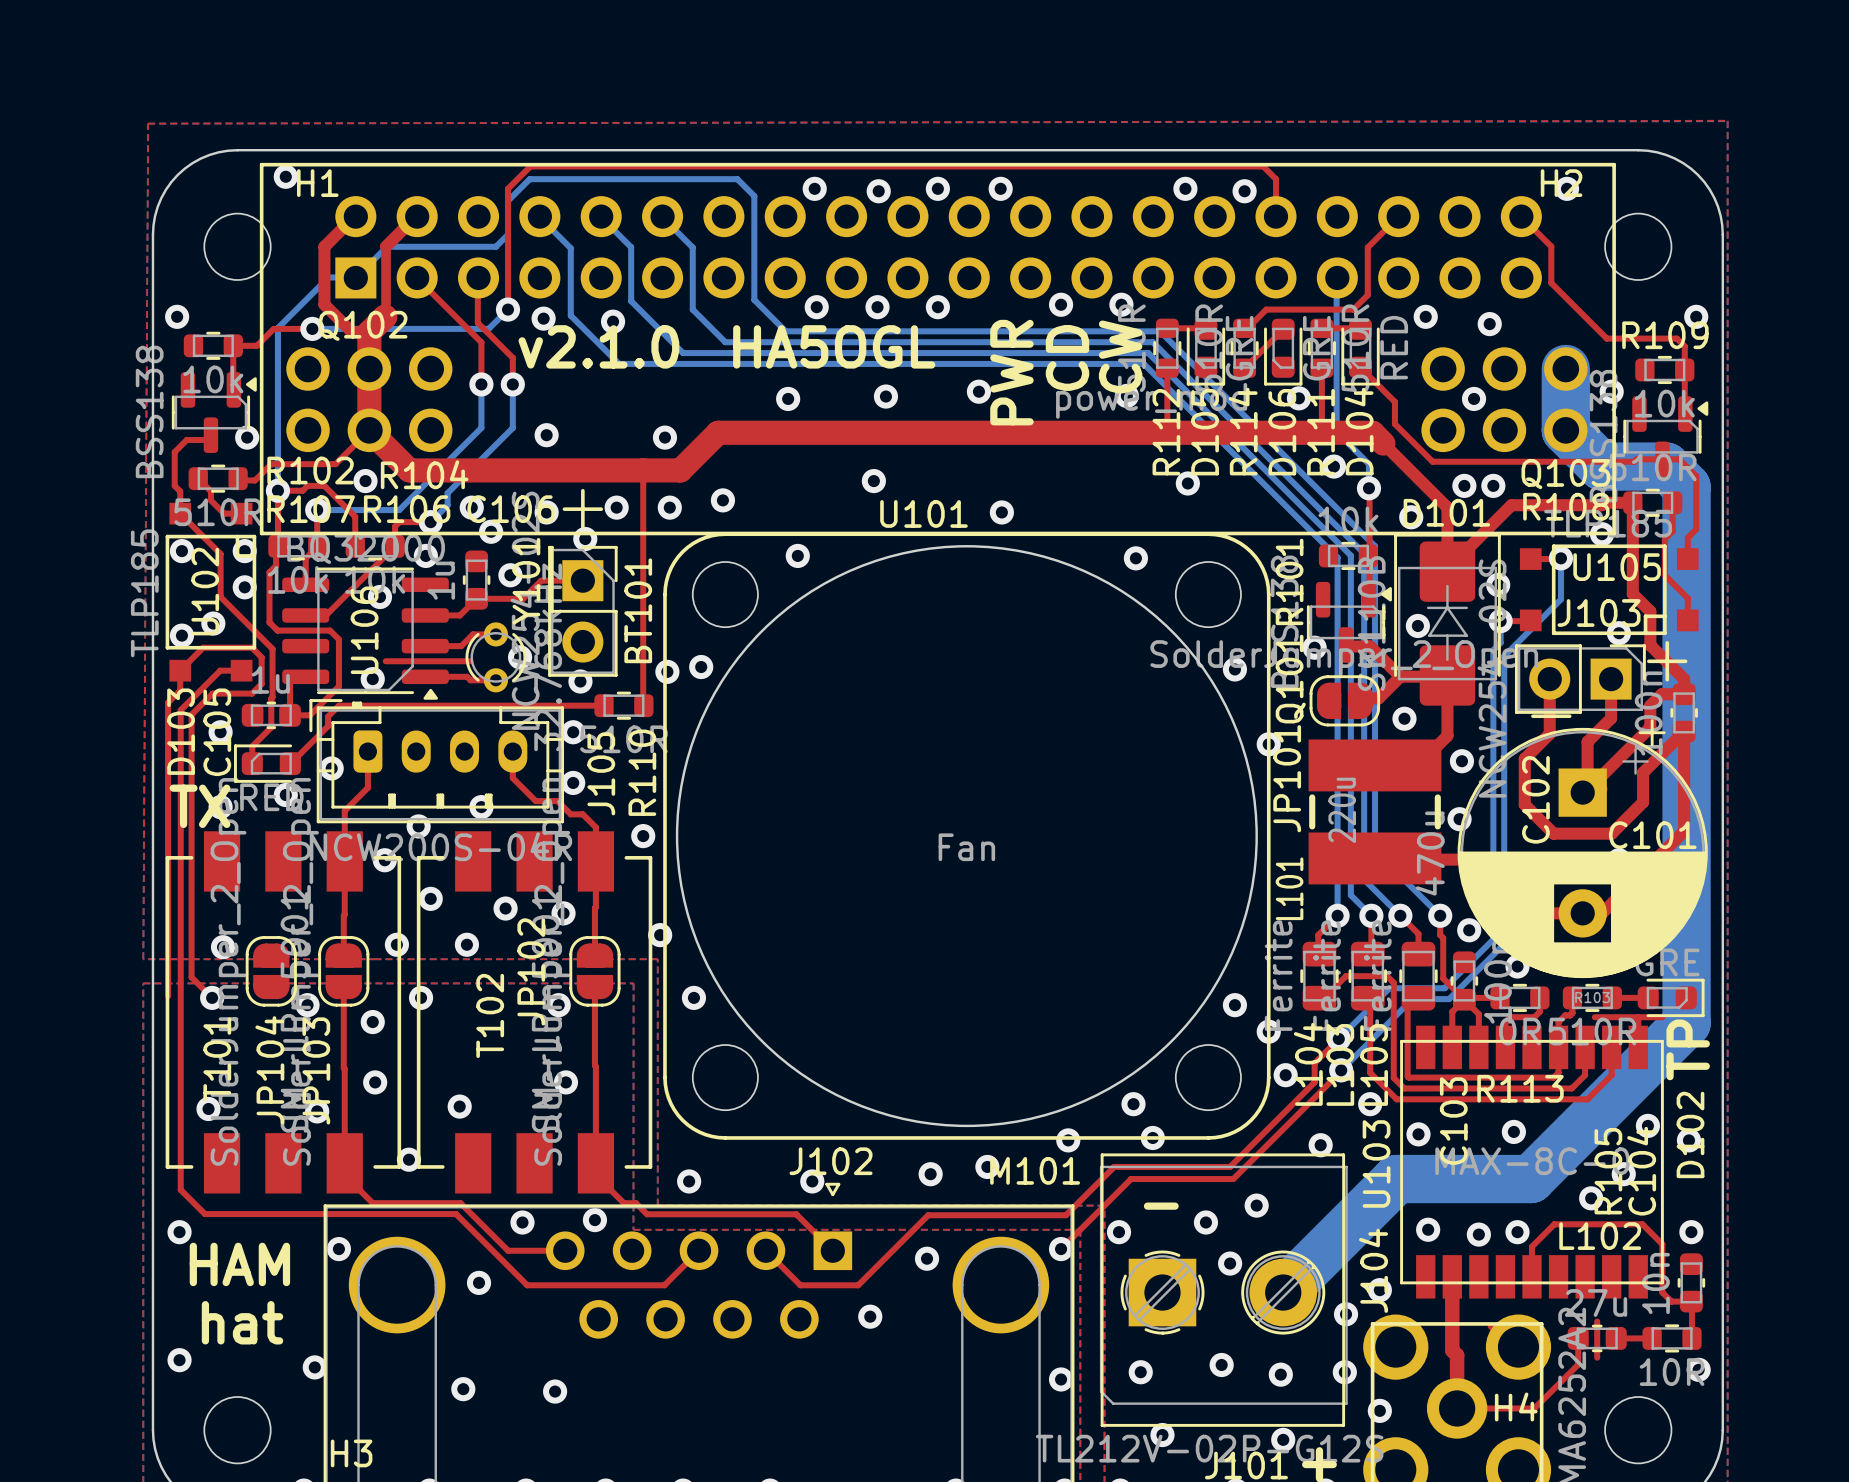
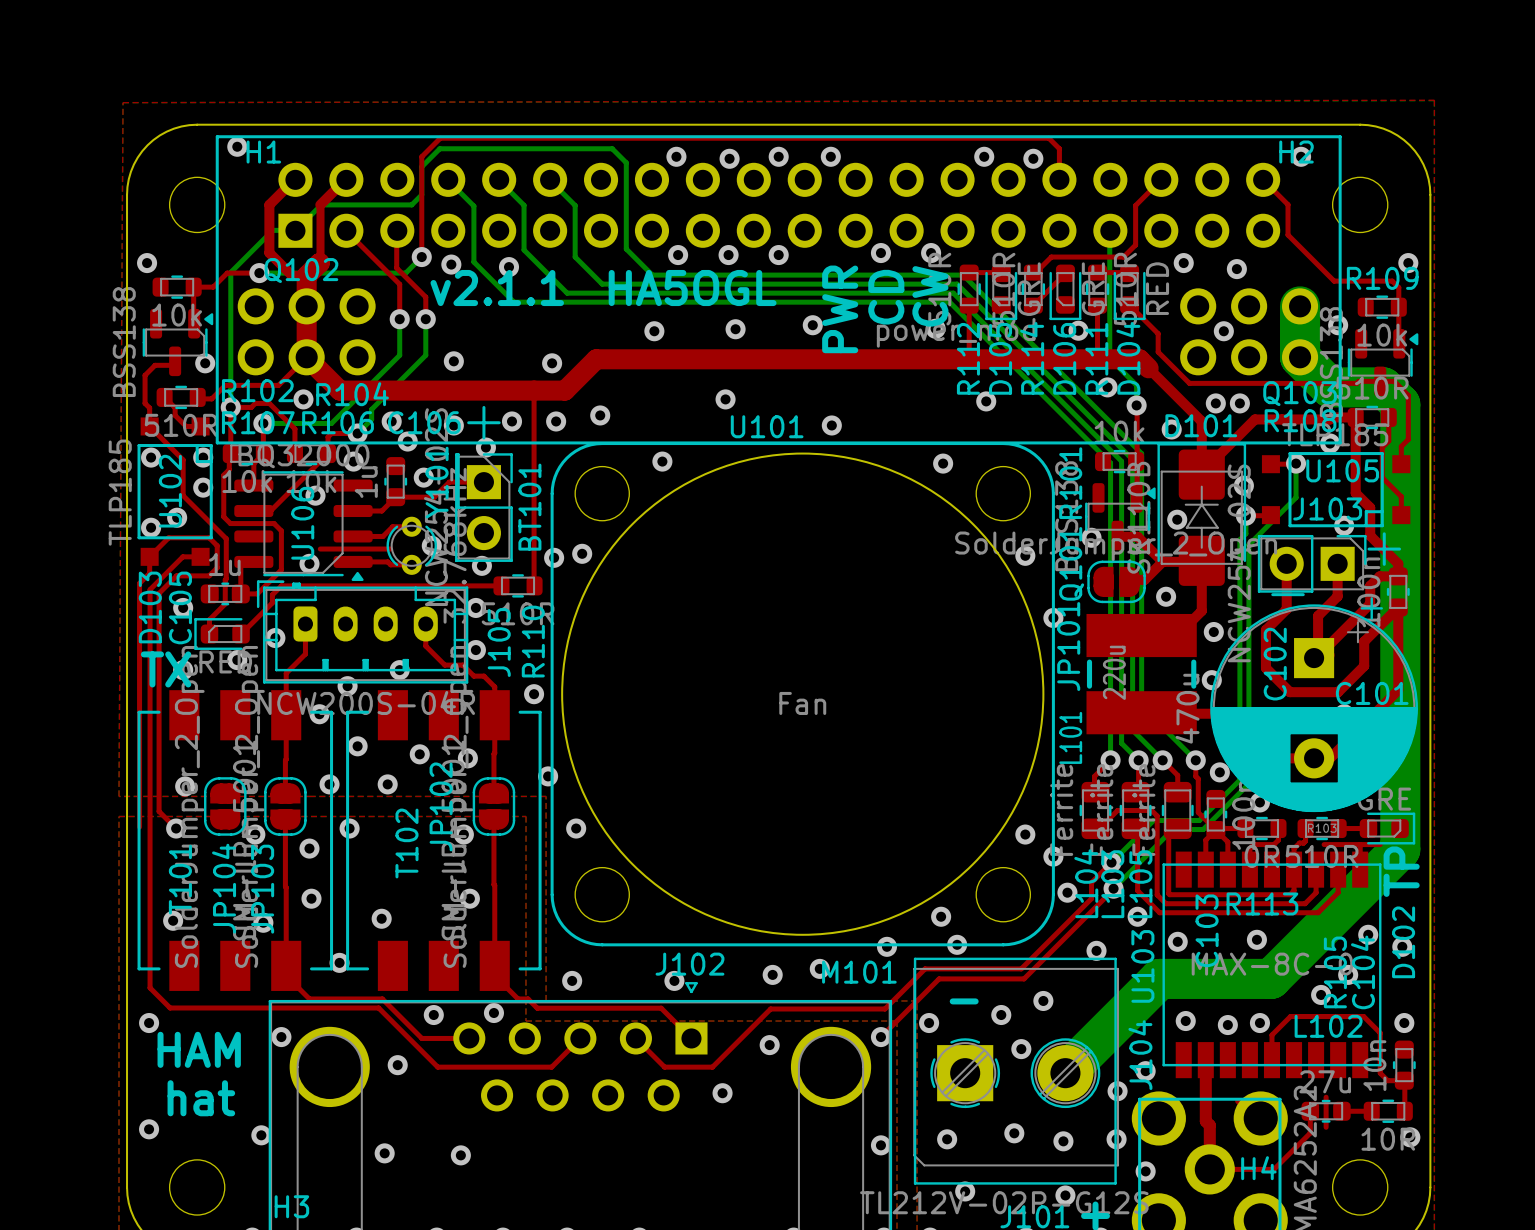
text: v2.1.0 (598, 346) -> v2.1.1 (497, 288)

